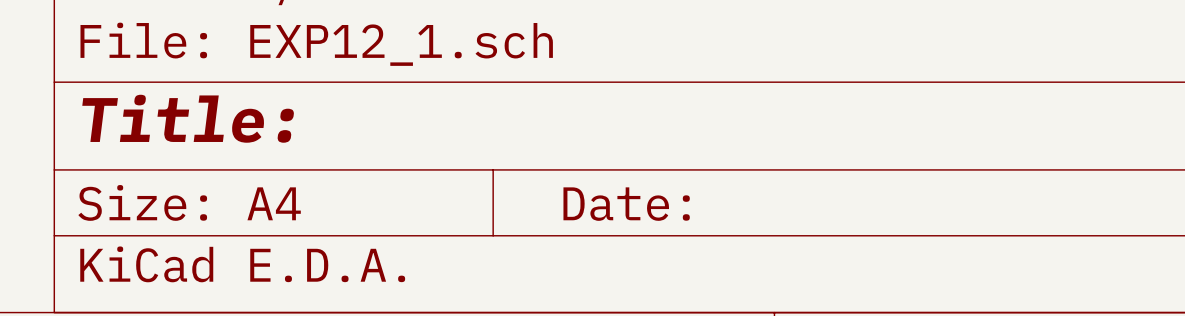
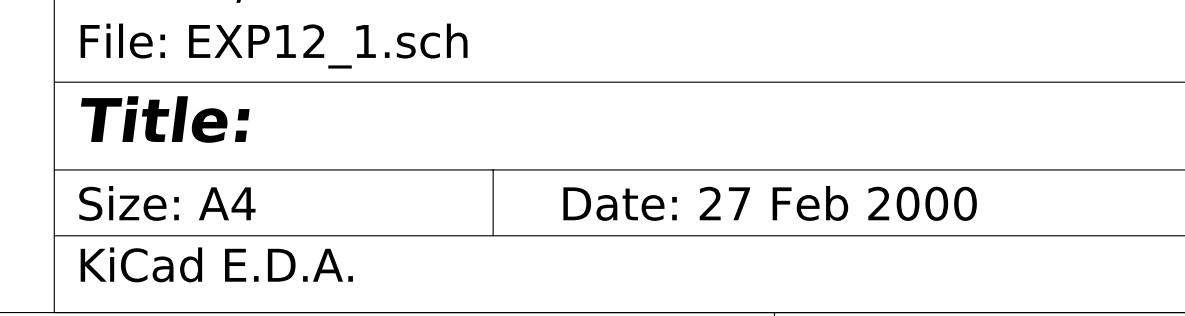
title block: Date: (626, 204) -> Date: 27 Feb 2000 (770, 203)

